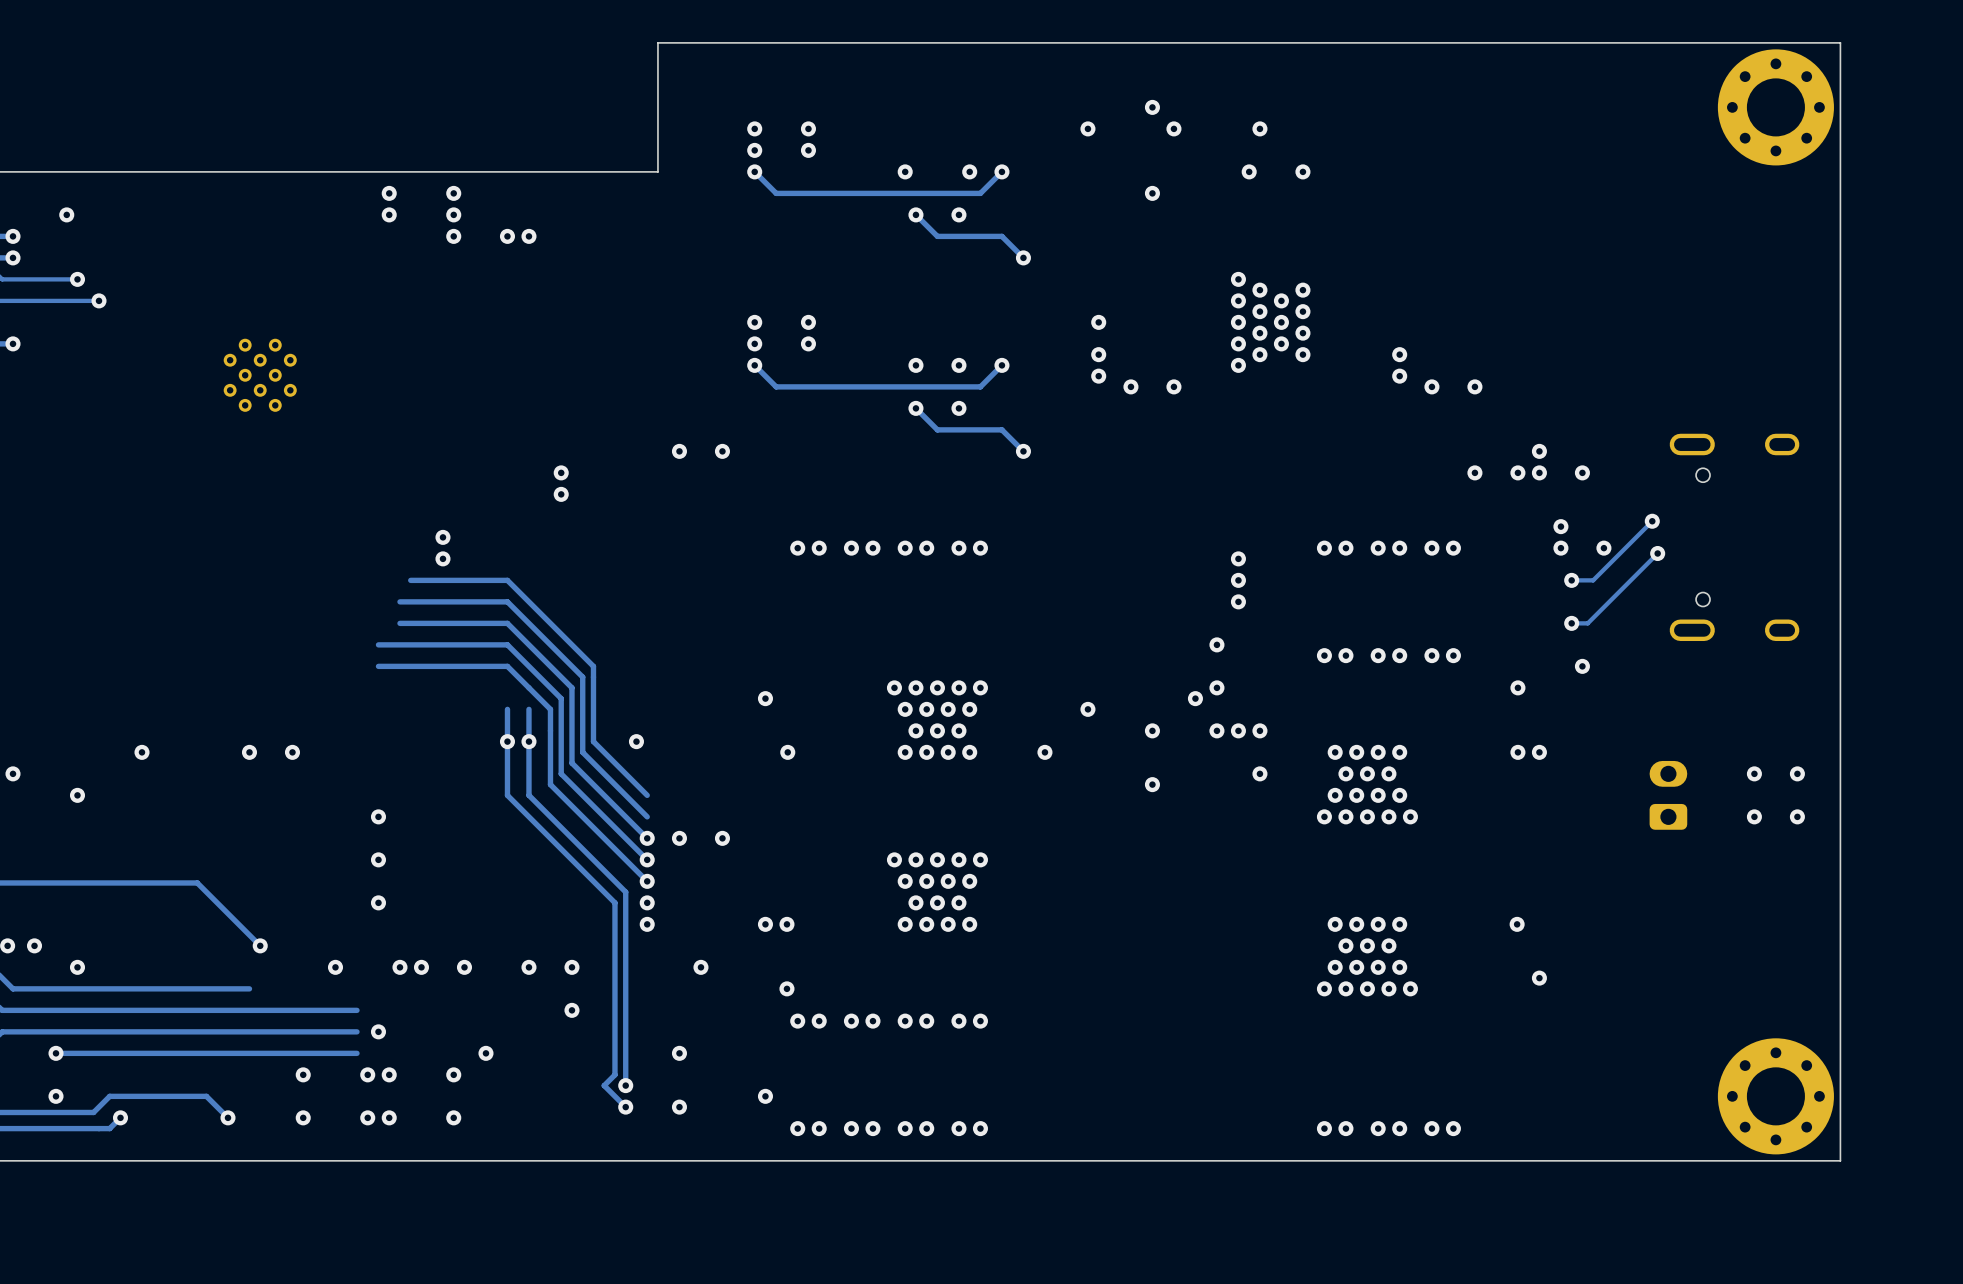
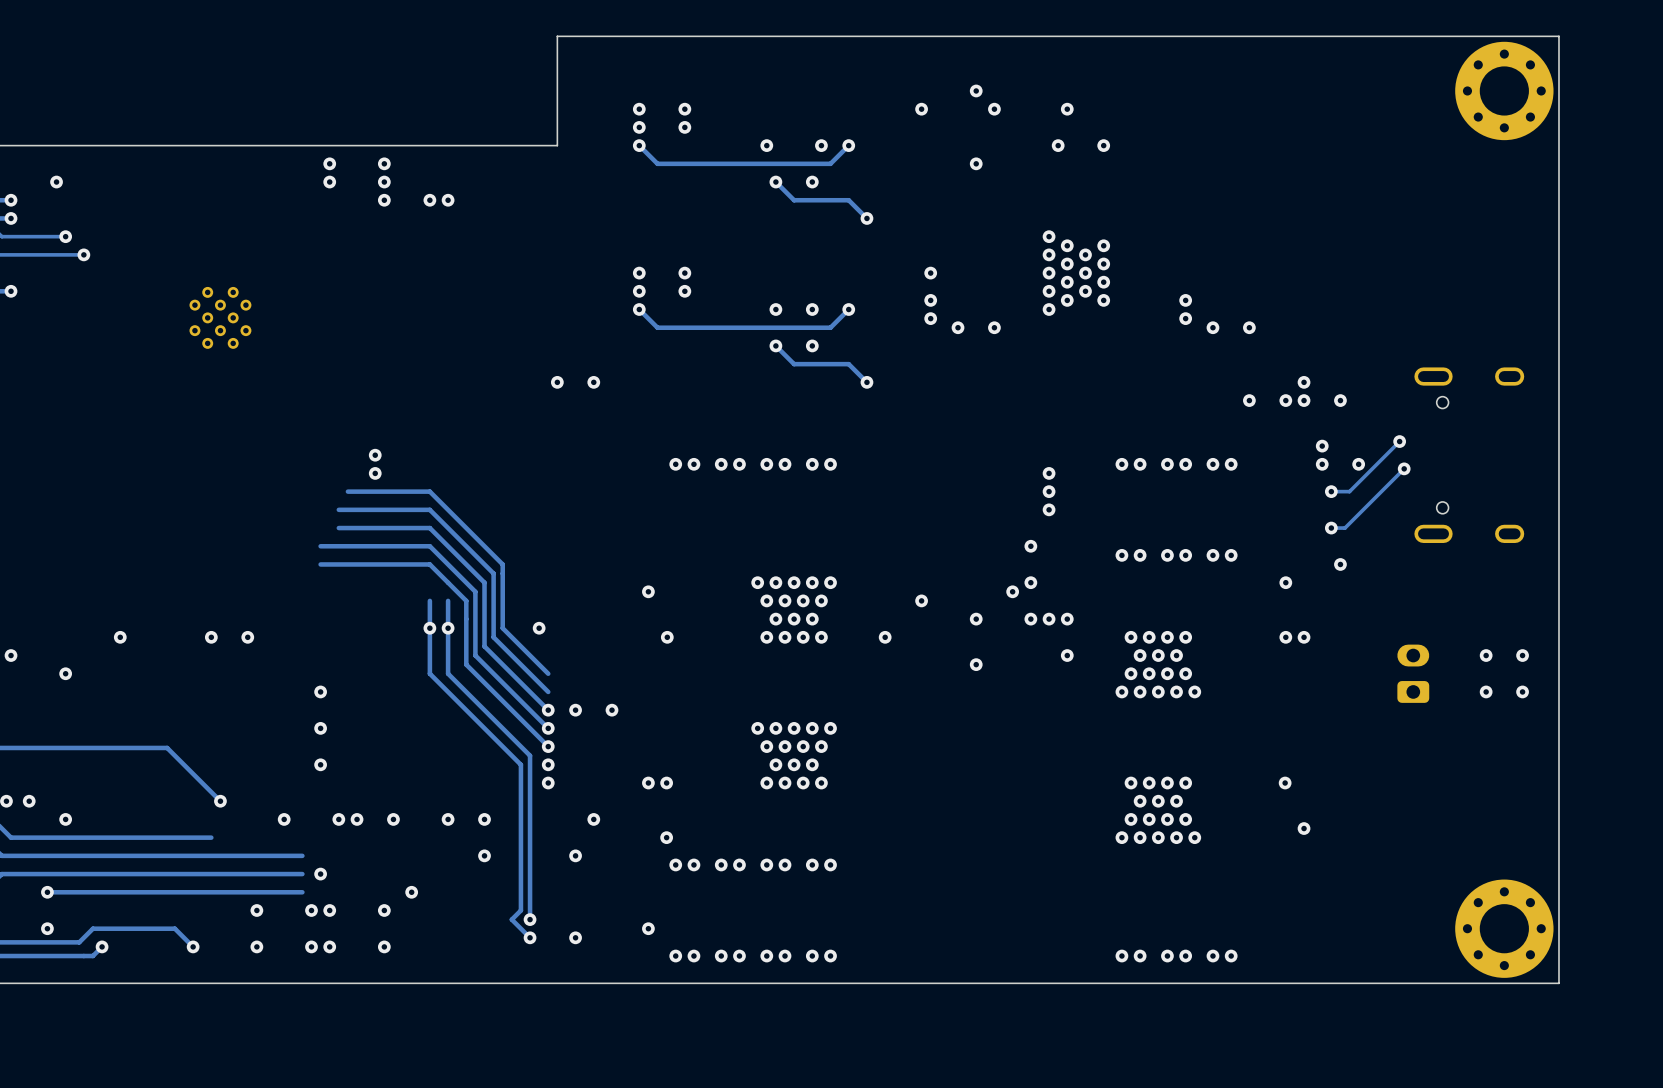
via: none -> (557, 382)
via: (679, 451) -> none
via: none -> (593, 382)
via: (722, 451) -> none
via: (561, 472) -> none
via: (561, 494) -> none
via position: (679, 1053) -> (575, 855)

